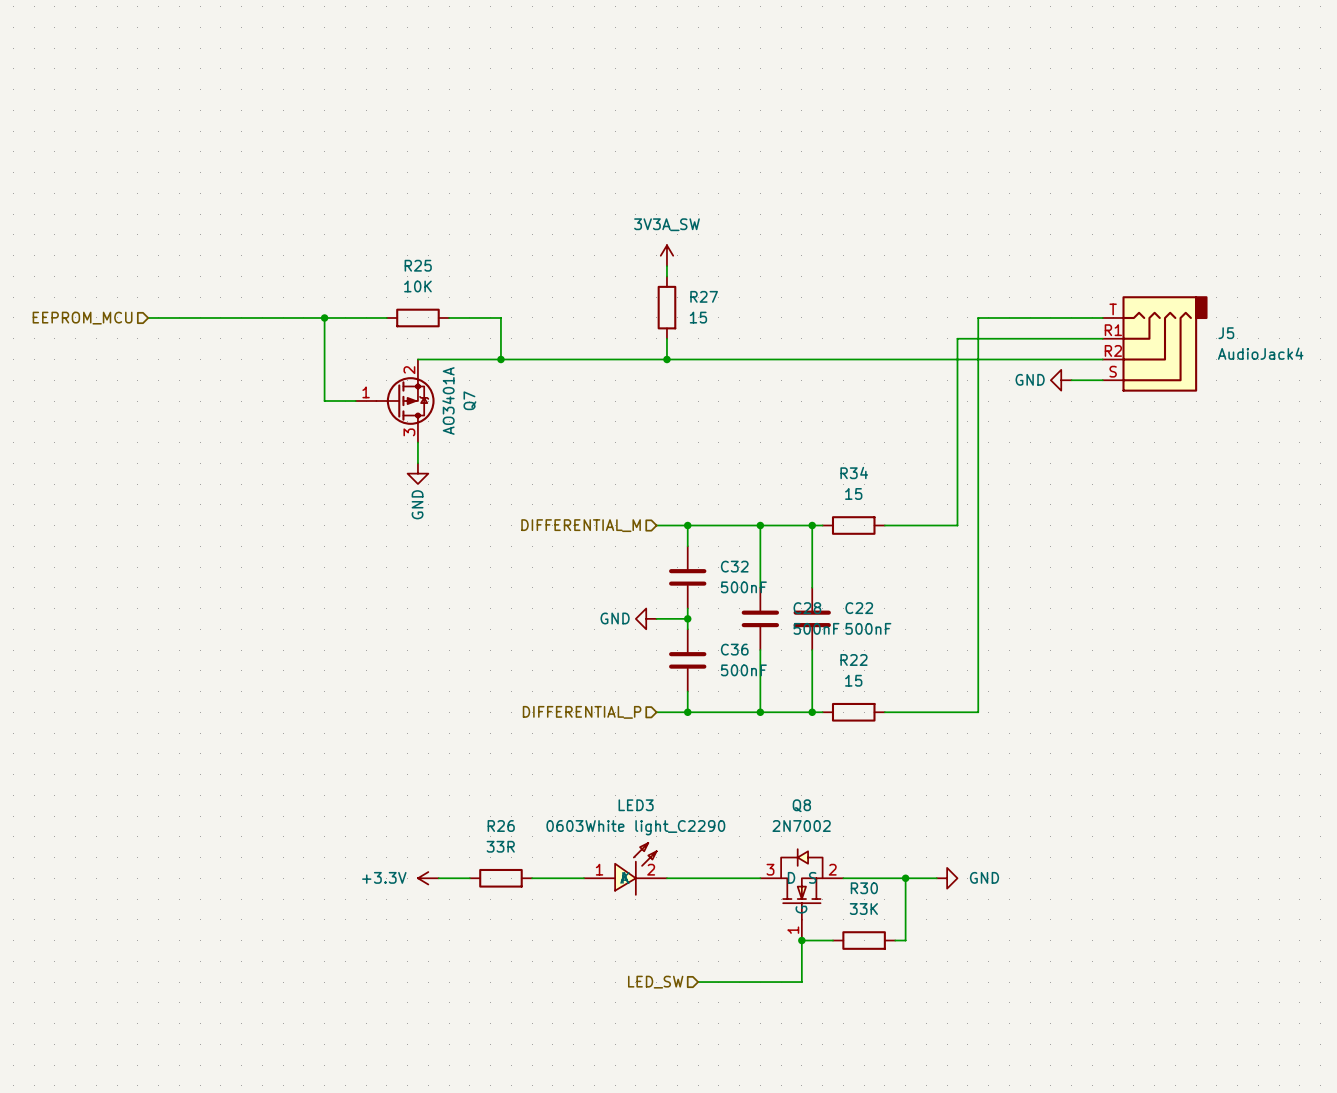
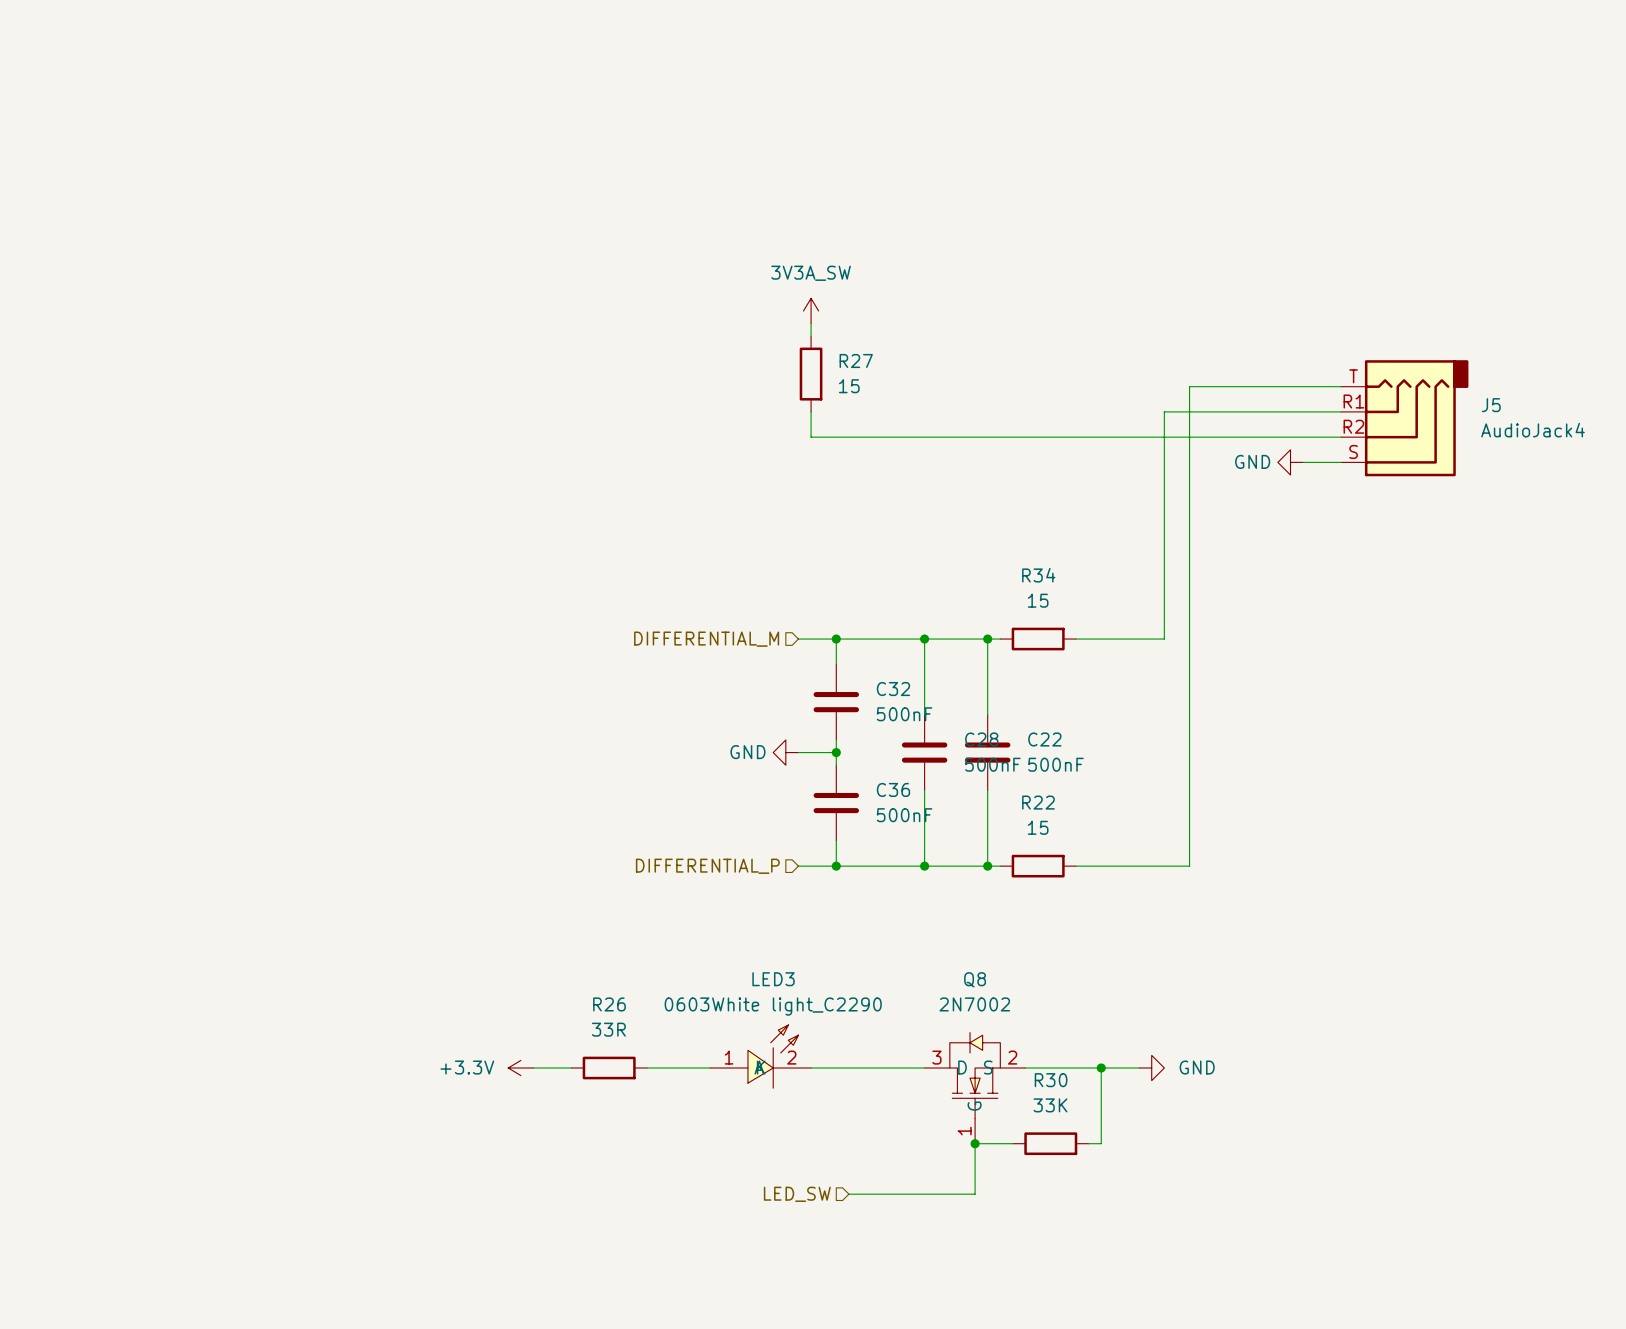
wire: (148, 317) (386, 317) -> none
wire: (324, 317) (324, 401) (355, 401) -> none
junction: (324, 317) -> none
R25: 10K (417, 317) -> none
wire: (449, 317) (500, 317) (500, 359) -> none
hierarchical label: EEPROM_MCU (82, 318) -> none
wire: (417, 359) (666, 359) -> none
junction: (500, 359) -> none
junction: (666, 359) -> none
Q7: AO3401A (395, 401) -> none
wire: (417, 442) (417, 463) -> none
power symbol: GND (417, 473) -> none

